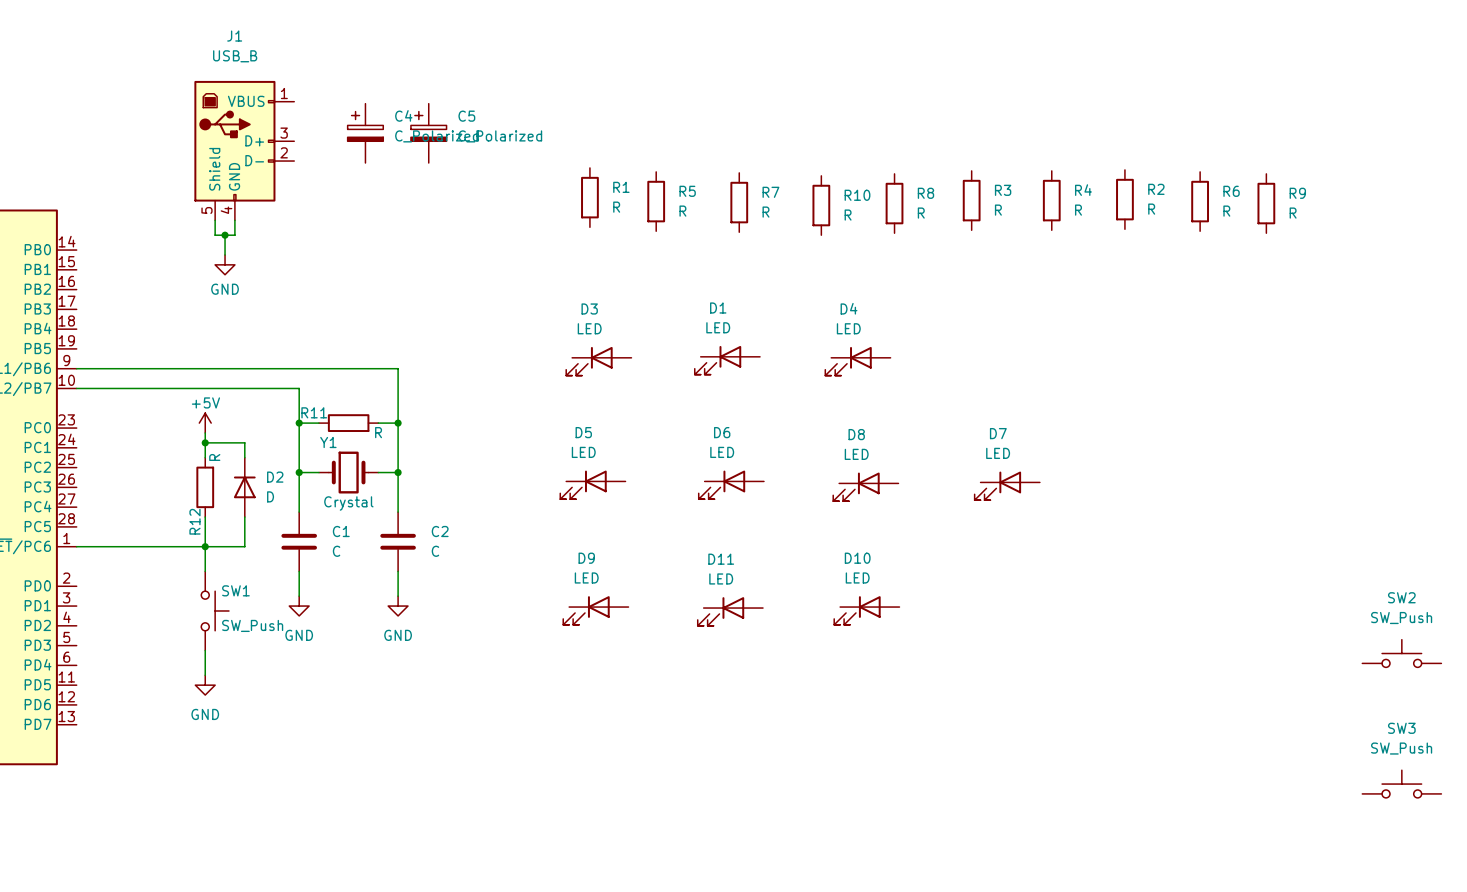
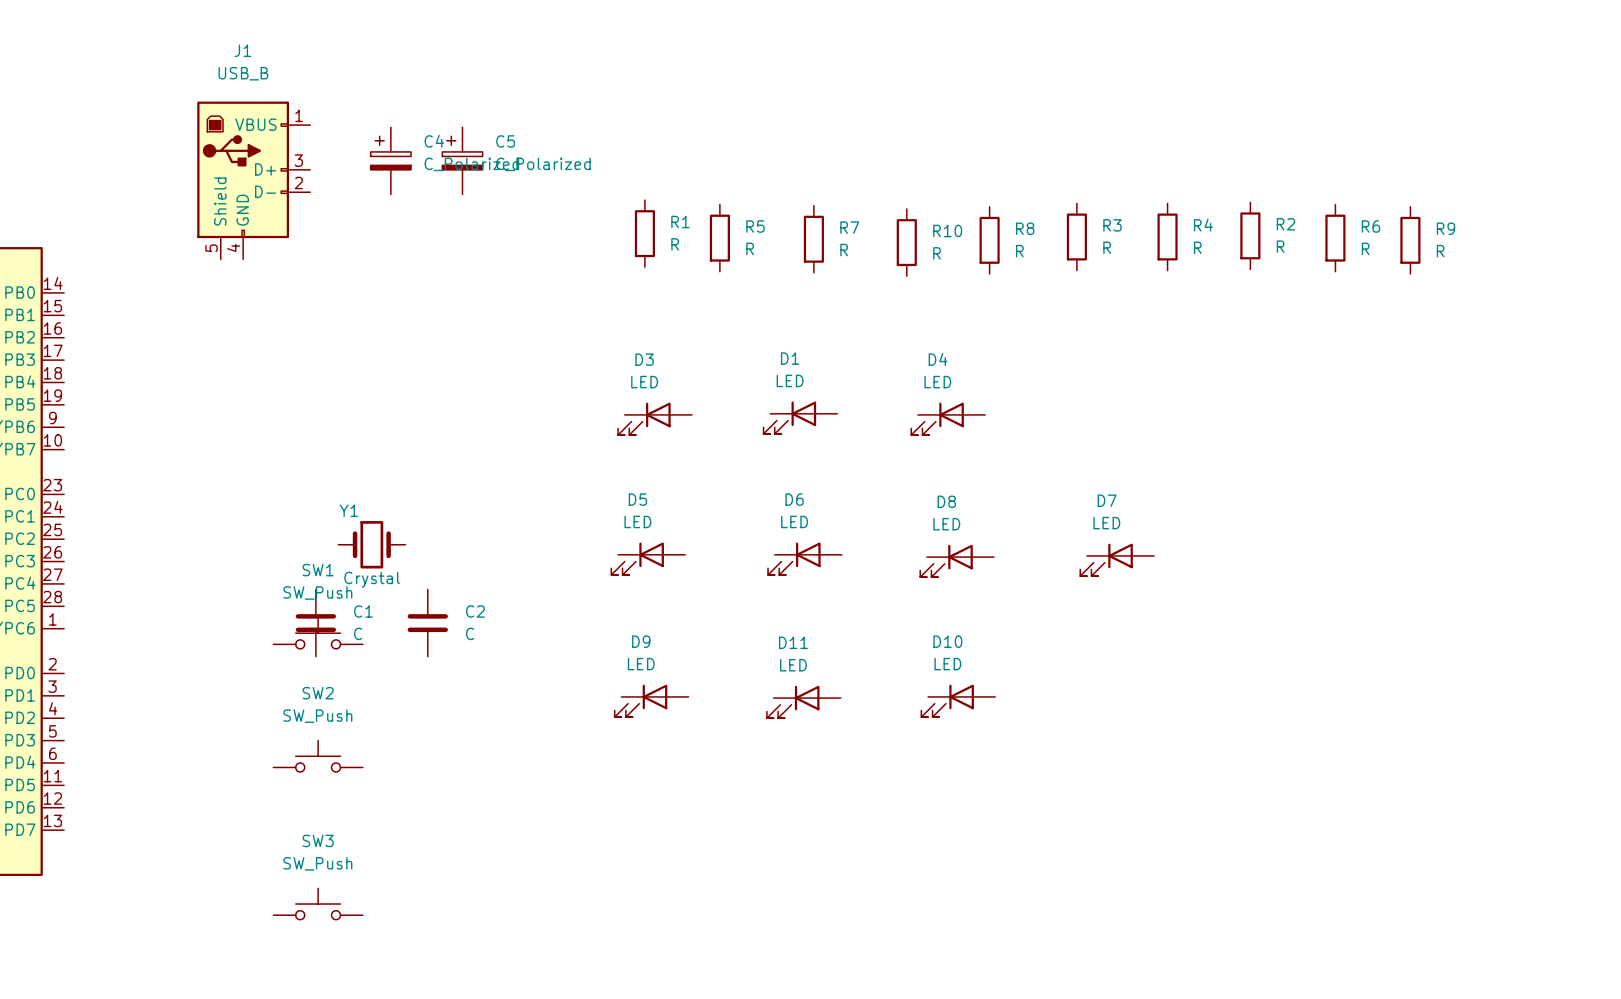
wire: (215, 220) (215, 235) (234, 235) (234, 220) -> none
wire: (225, 235) (225, 254) -> none
junction: (225, 235) -> none
power symbol: GND (225, 264) -> none
wire: (76, 368) (398, 368) (398, 512) -> none
wire: (76, 388) (299, 388) (299, 512) -> none
power symbol: +5V (205, 423) -> none
wire: (299, 423) (318, 423) -> none
junction: (299, 423) -> none
R11: R (348, 423) -> none
wire: (378, 423) (398, 423) -> none
junction: (398, 423) -> none
wire: (205, 432) (205, 457) -> none
wire: (205, 442) (244, 442) (244, 457) -> none
junction: (205, 442) -> none
wire: (299, 472) (318, 472) -> none
junction: (299, 472) -> none
wire: (378, 472) (398, 472) -> none
junction: (398, 472) -> none
R12: R (205, 487) -> none
D2: D (244, 487) -> none
wire: (205, 517) (205, 571) -> none
wire: (244, 517) (244, 546) (76, 546) -> none
junction: (205, 546) -> none
wire: (299, 571) (299, 596) -> none
wire: (398, 571) (398, 596) -> none
SW1 name position: SW1 (235, 590) -> SW1 (318, 570)
power symbol: GND (299, 606) -> none
power symbol: GND (398, 606) -> none
SW1 rotation: 0° (215, 610) -> 90° counterclockwise (318, 633)
SW1 position: (215, 610) -> (318, 633)
SW1 value position: SW_Push (252, 625) -> SW_Push (317, 593)
wire: (205, 650) (205, 675) -> none
SW2 position: (1401, 653) -> (318, 756)
power symbol: GND (205, 685) -> none
SW3 position: (1401, 784) -> (318, 904)

